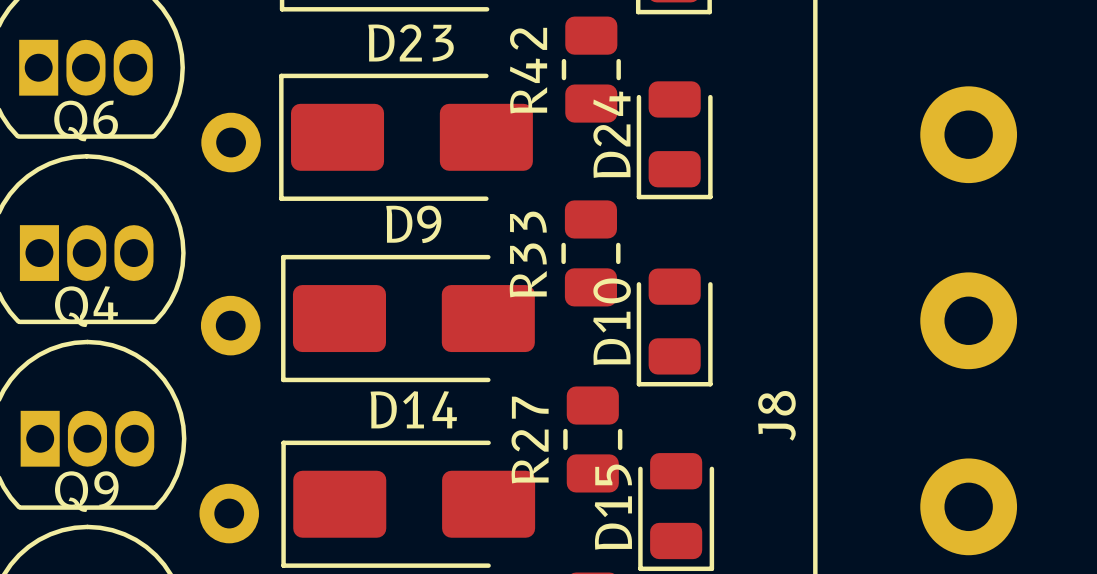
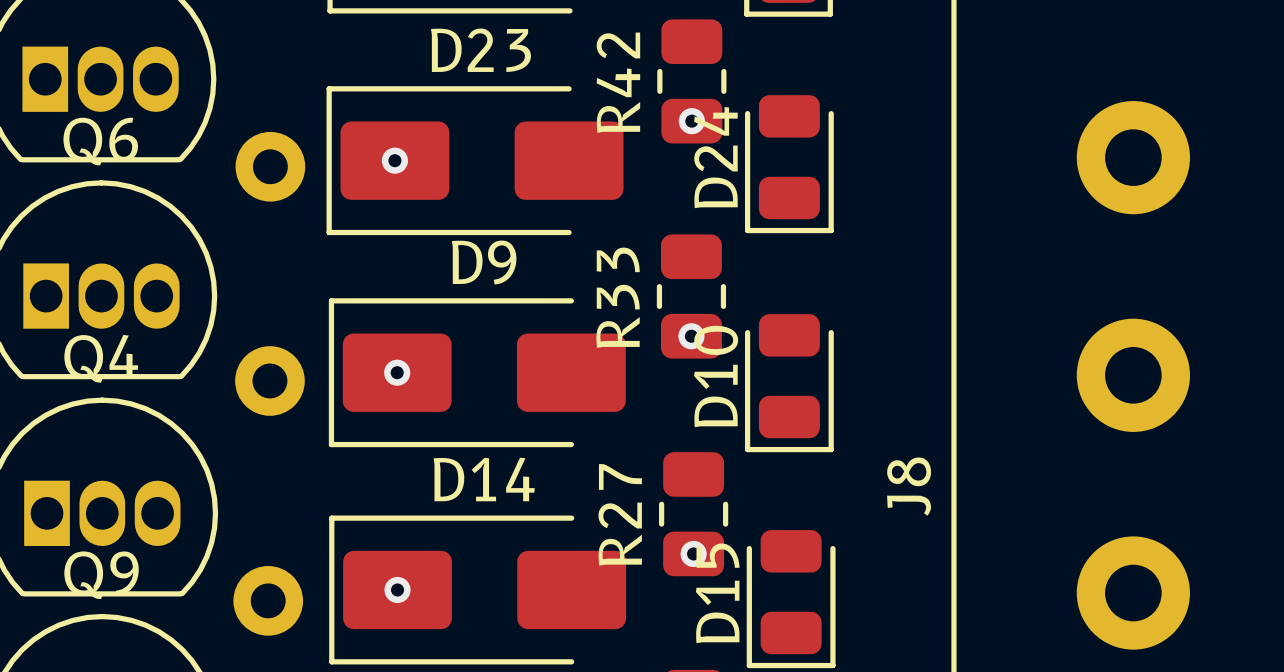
via: none -> (691, 121)
via: none -> (394, 160)
via: none -> (691, 336)
via: none -> (397, 372)
via: none -> (693, 553)
via: none -> (397, 589)

